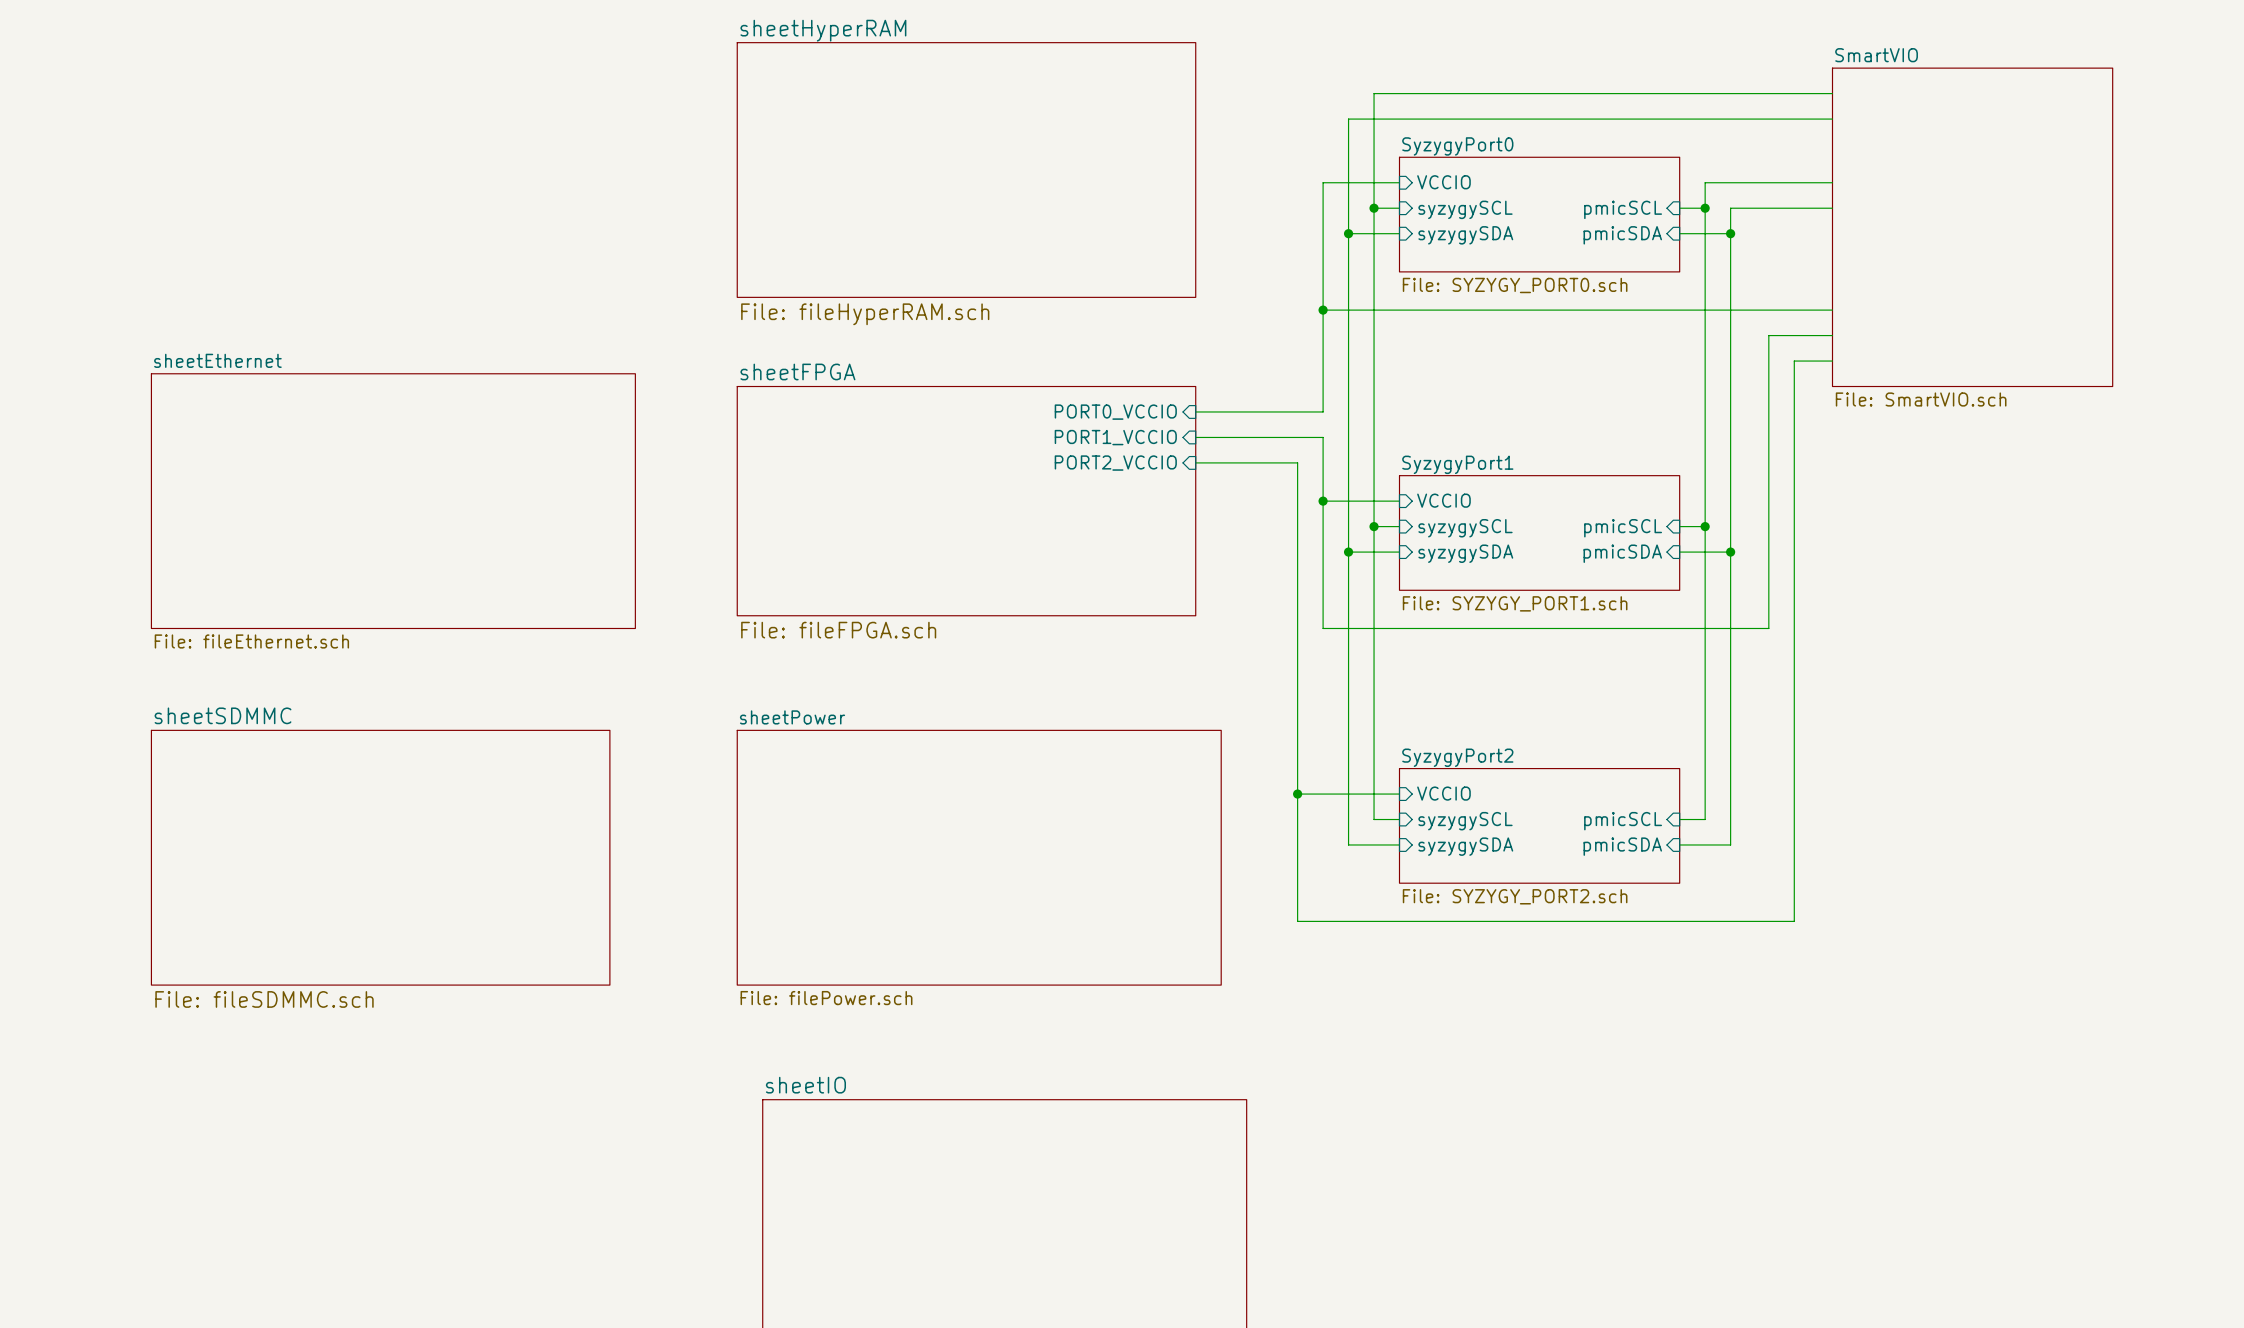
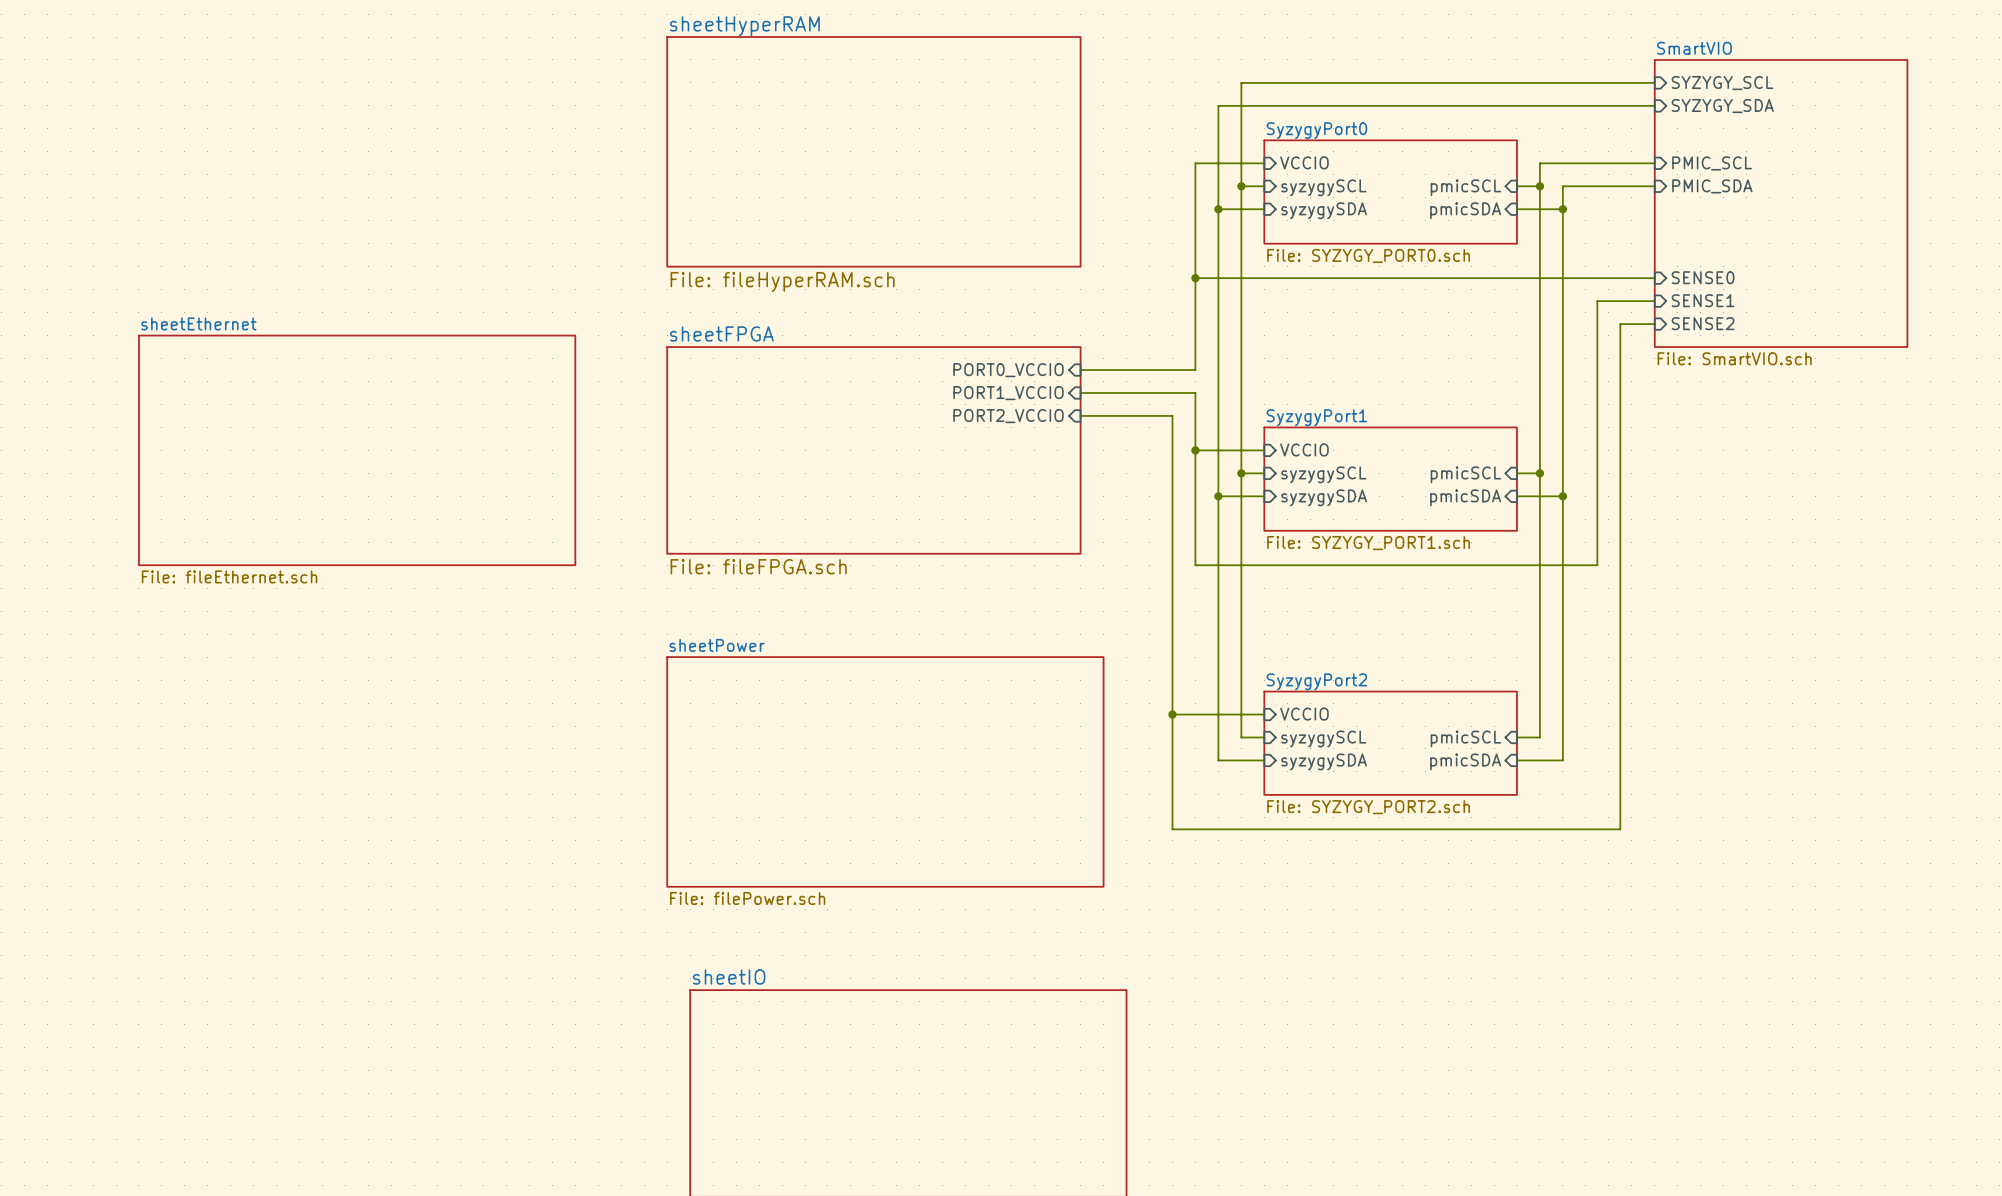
sheet pin: none -> SYZYGY_SCL (1722, 83)
sheet pin: none -> SYZYGY_SDA (1722, 106)
sheet pin: none -> PMIC_SCL (1712, 163)
sheet pin: none -> PMIC_SDA (1712, 186)
sheet pin: none -> SENSE0 (1703, 277)
sheet pin: none -> SENSE1 (1703, 300)
sheet pin: none -> SENSE2 (1703, 323)
sheet sheetSDMMC: File: fileSDMMC.sch (380, 857) -> none

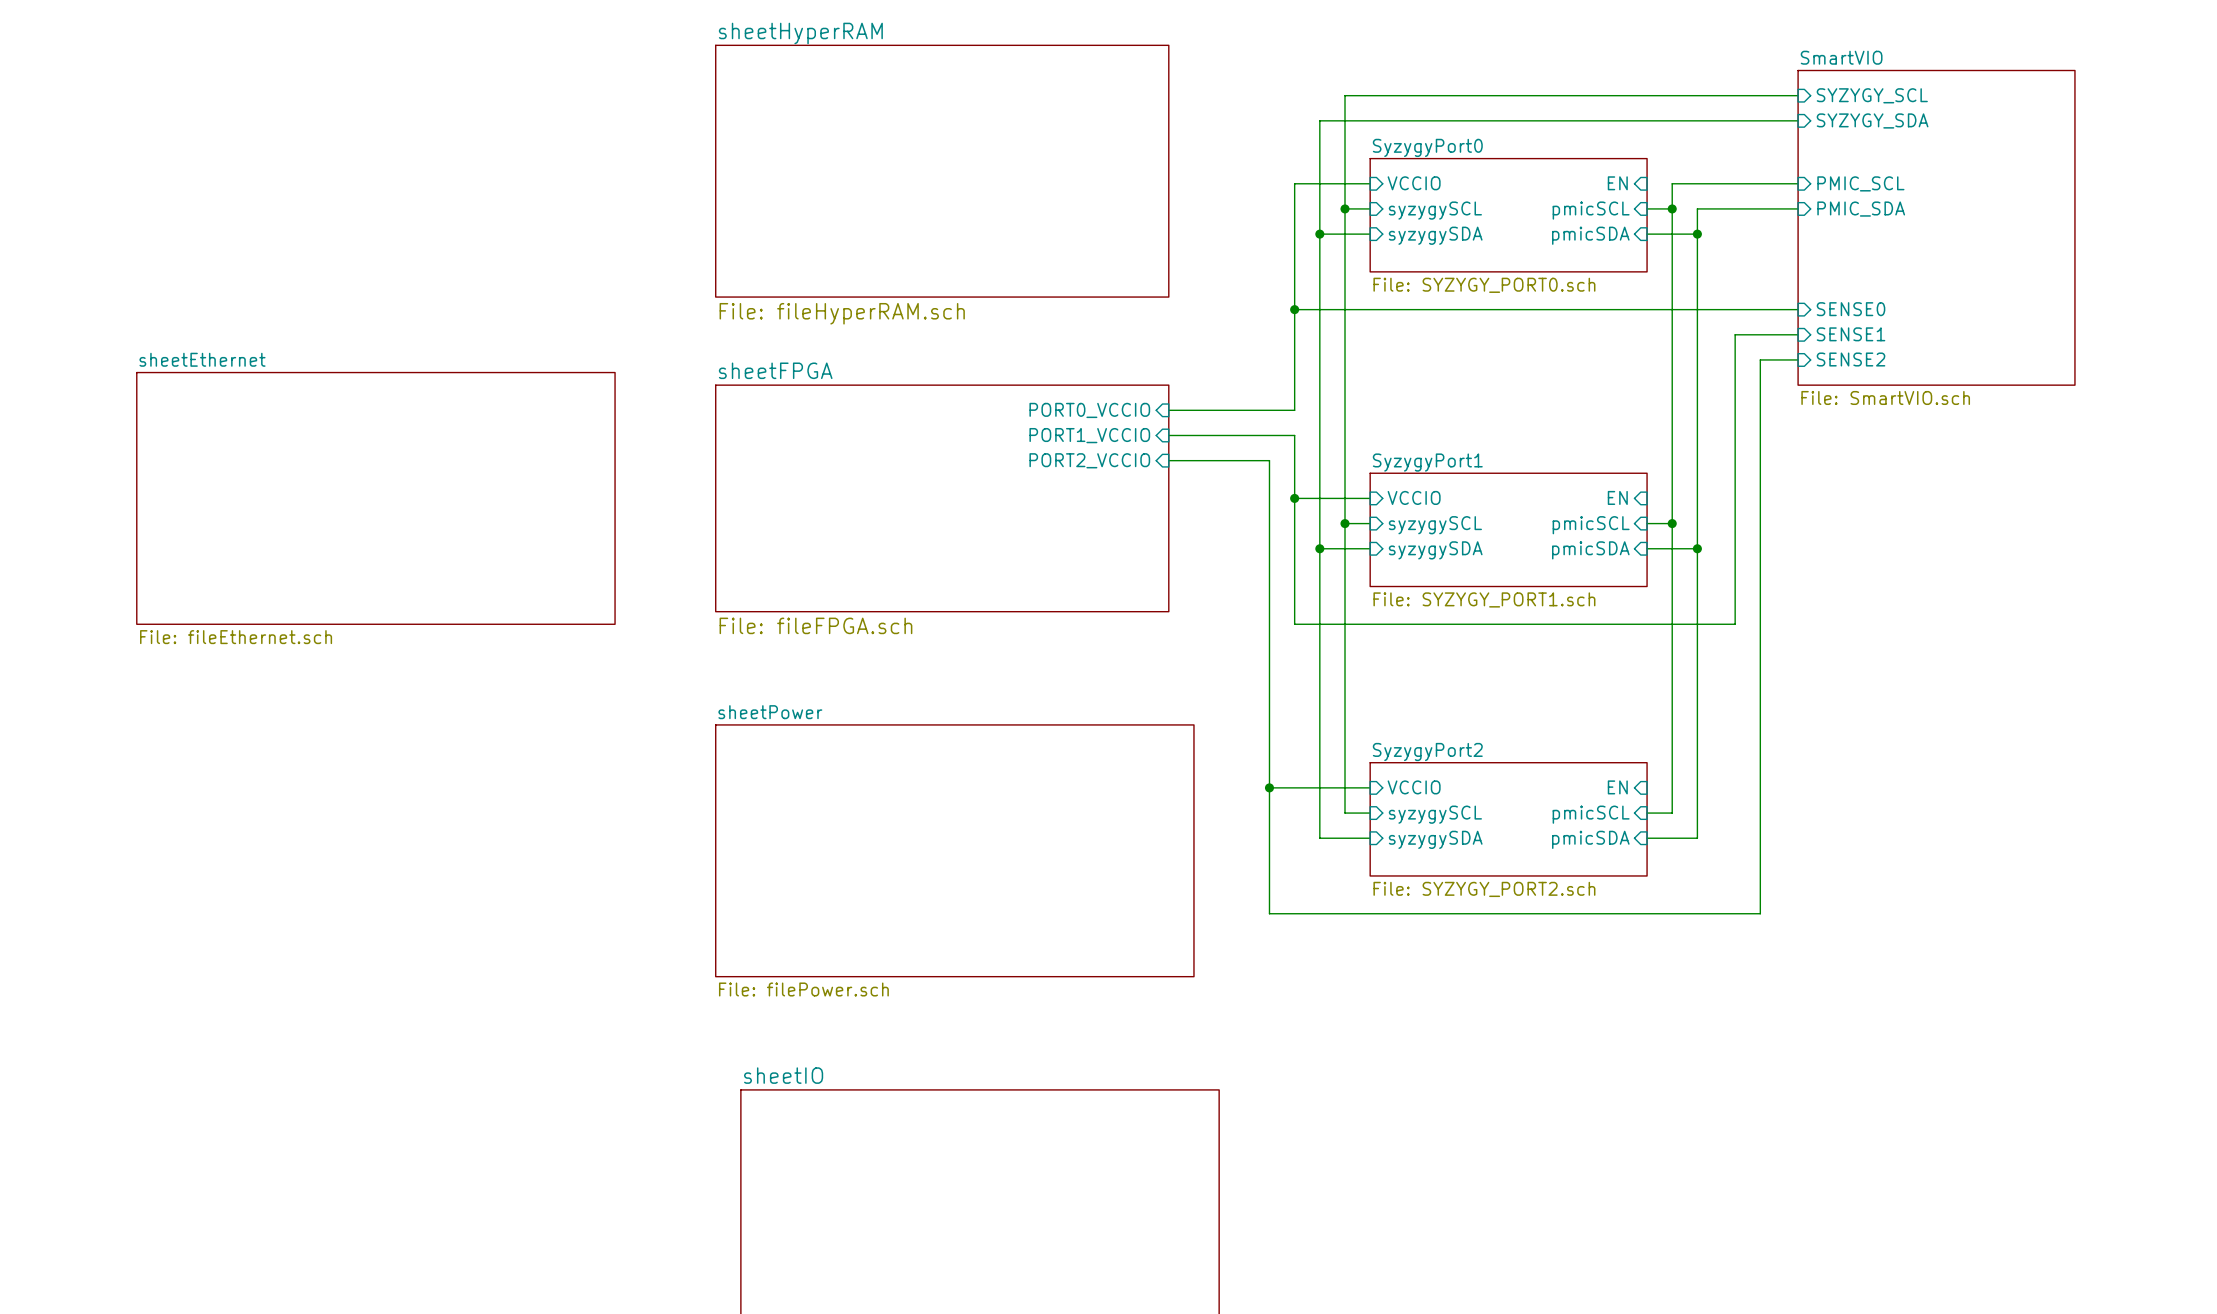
sheet pin: none -> EN (1617, 183)
sheet pin: none -> EN (1617, 497)
sheet pin: none -> EN (1617, 787)

